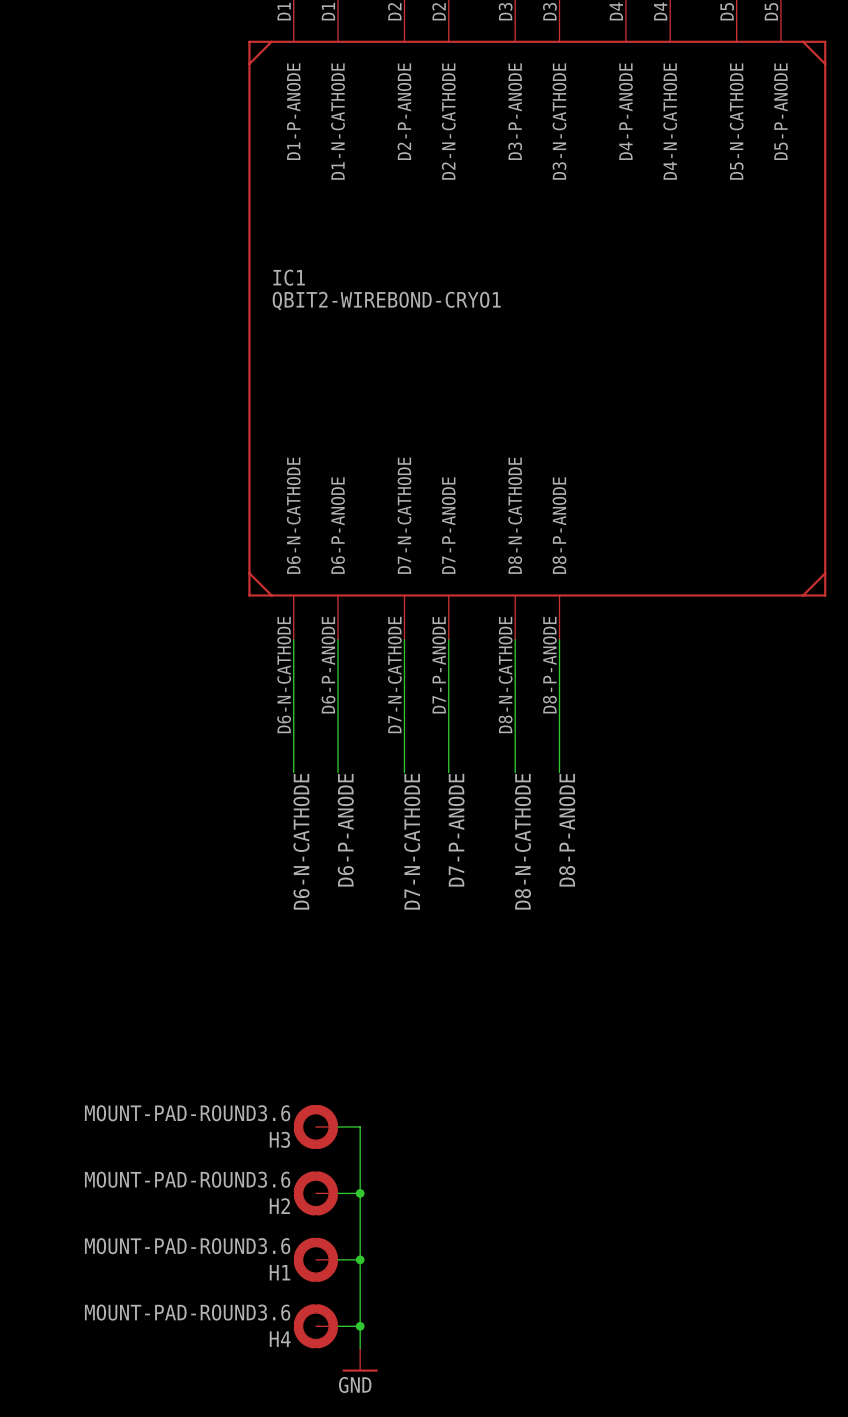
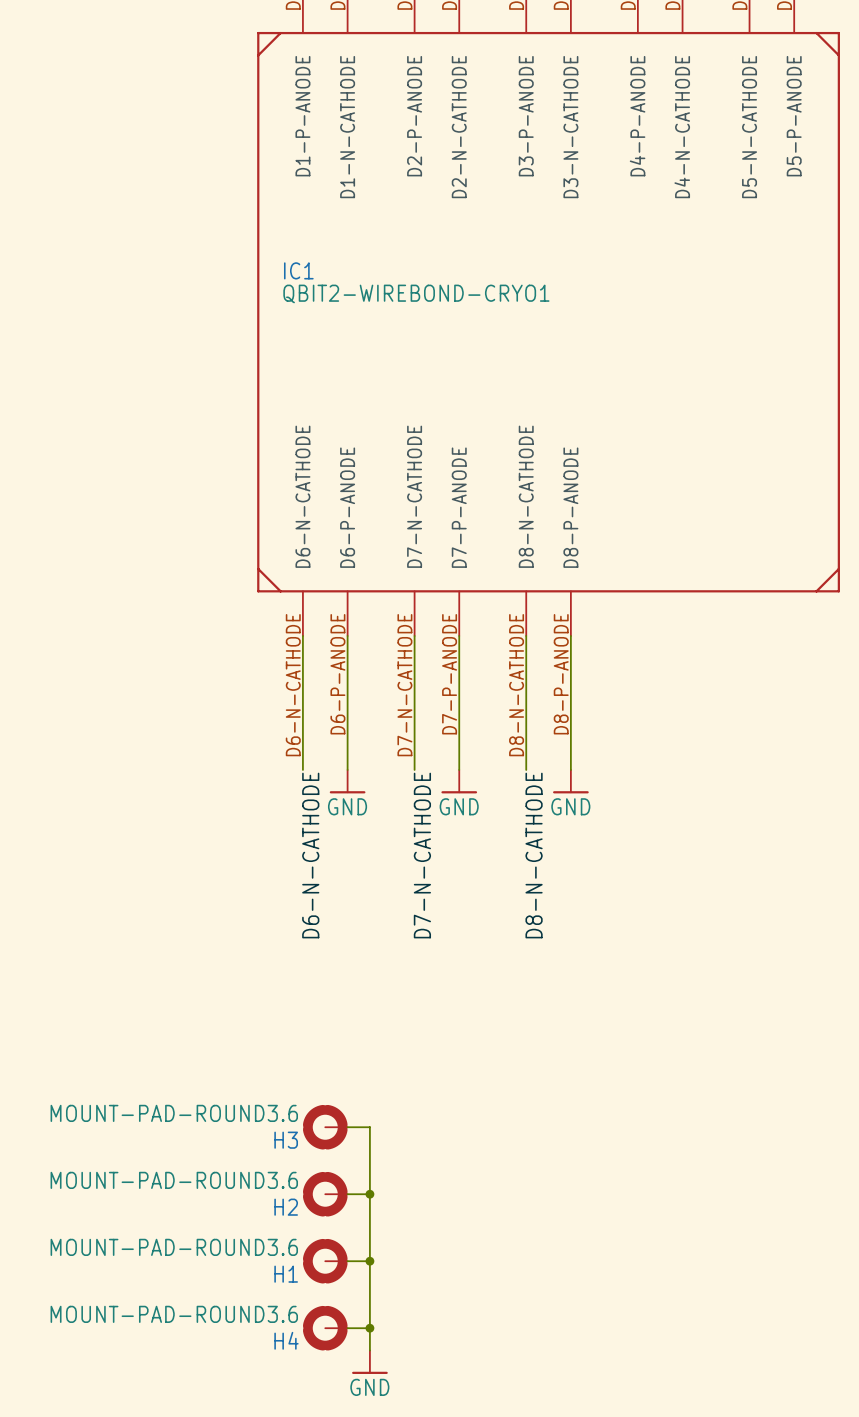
power symbol: none -> GND (347, 781)
power symbol: none -> GND (459, 781)
power symbol: none -> GND (570, 781)
label: D6-P-ANODE (345, 830) -> none
label: D7-P-ANODE (456, 830) -> none
label: D8-P-ANODE (567, 830) -> none

